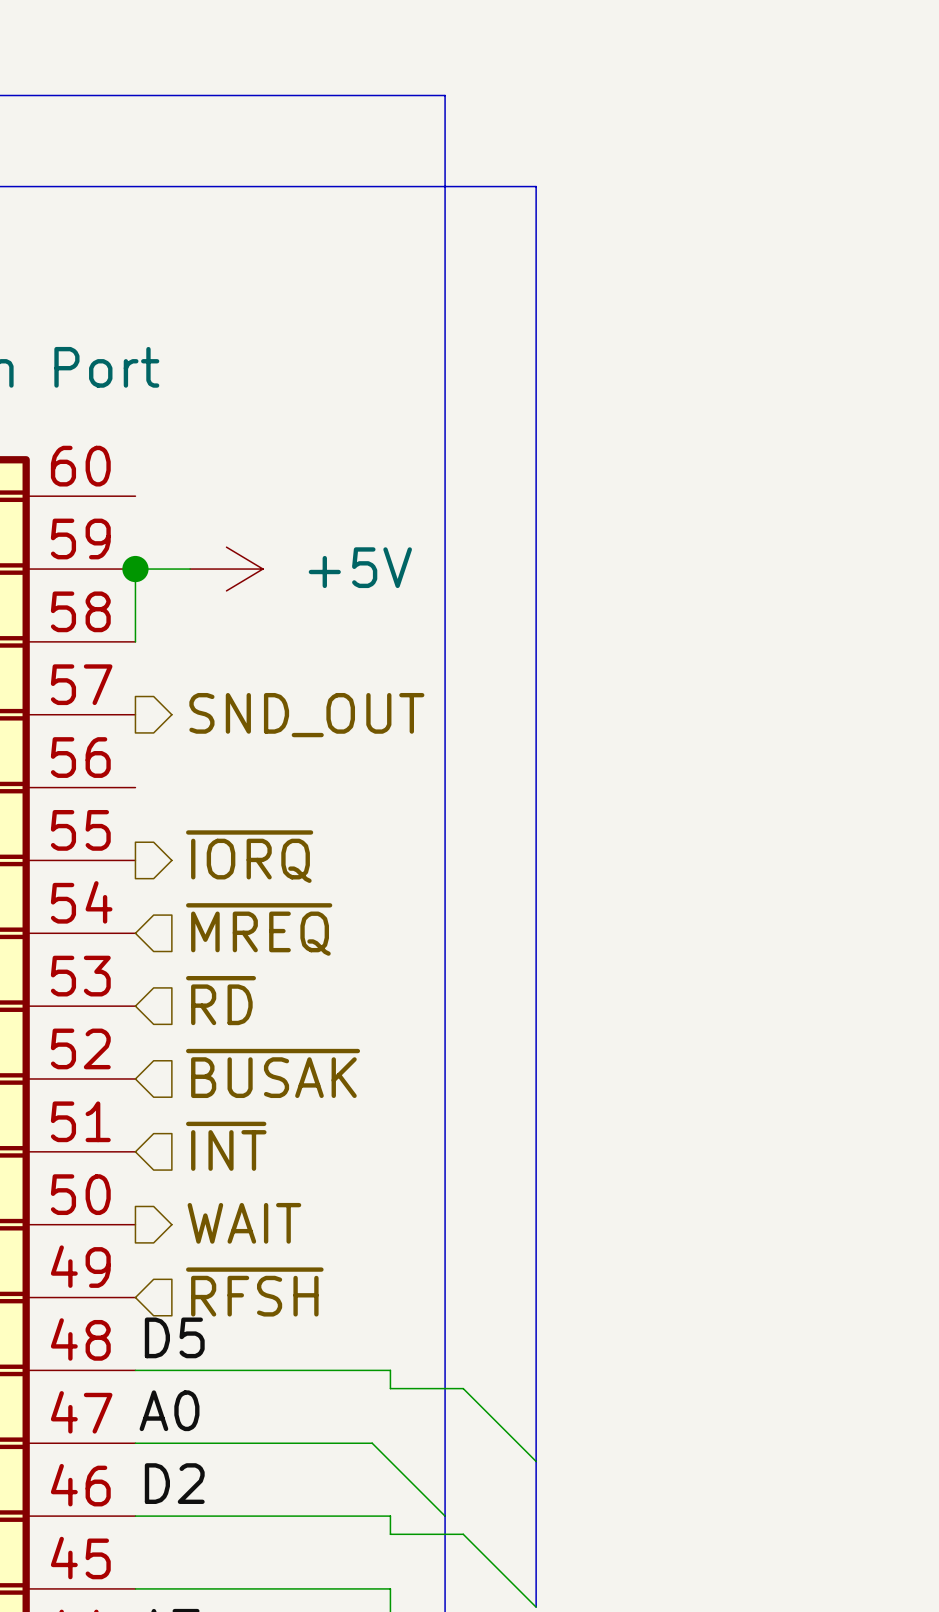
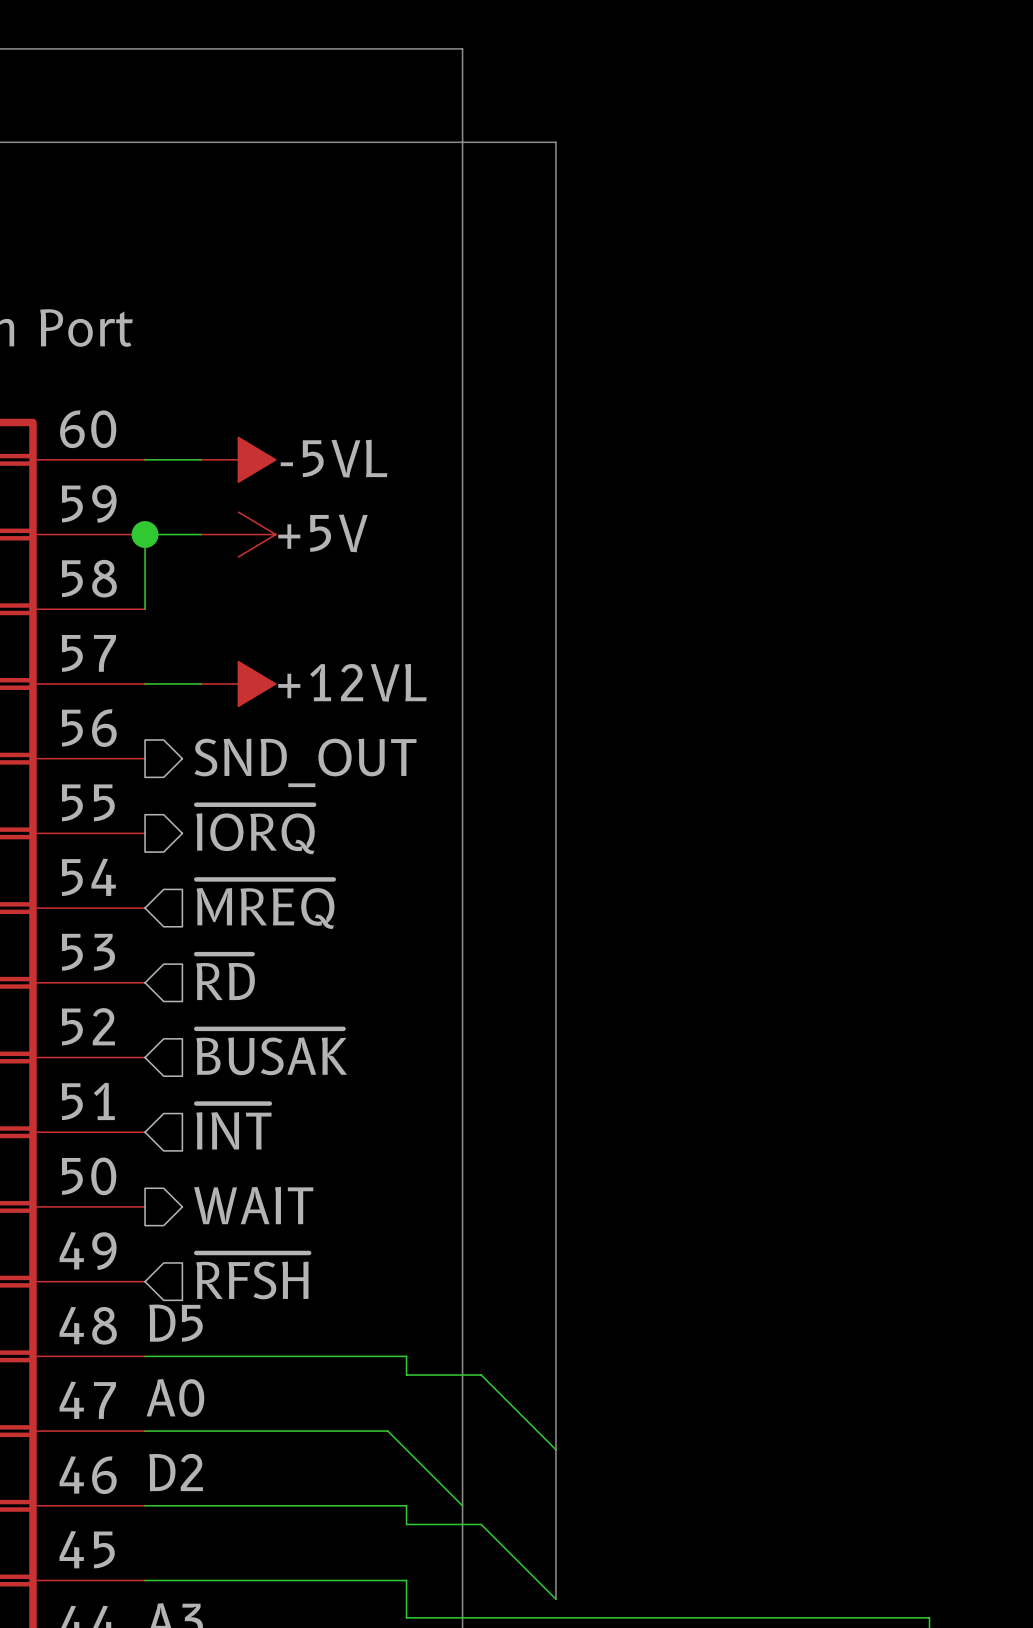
wire: none -> (145, 459) (201, 459)
power symbol: none -> -5VL (238, 459)
power symbol text position: +5V (360, 567) -> +5V (322, 533)
wire: none -> (145, 683) (201, 683)
power symbol: none -> +12VL (238, 683)
hierarchical label position: SND_OUT (306, 715) -> SND_OUT (305, 762)

